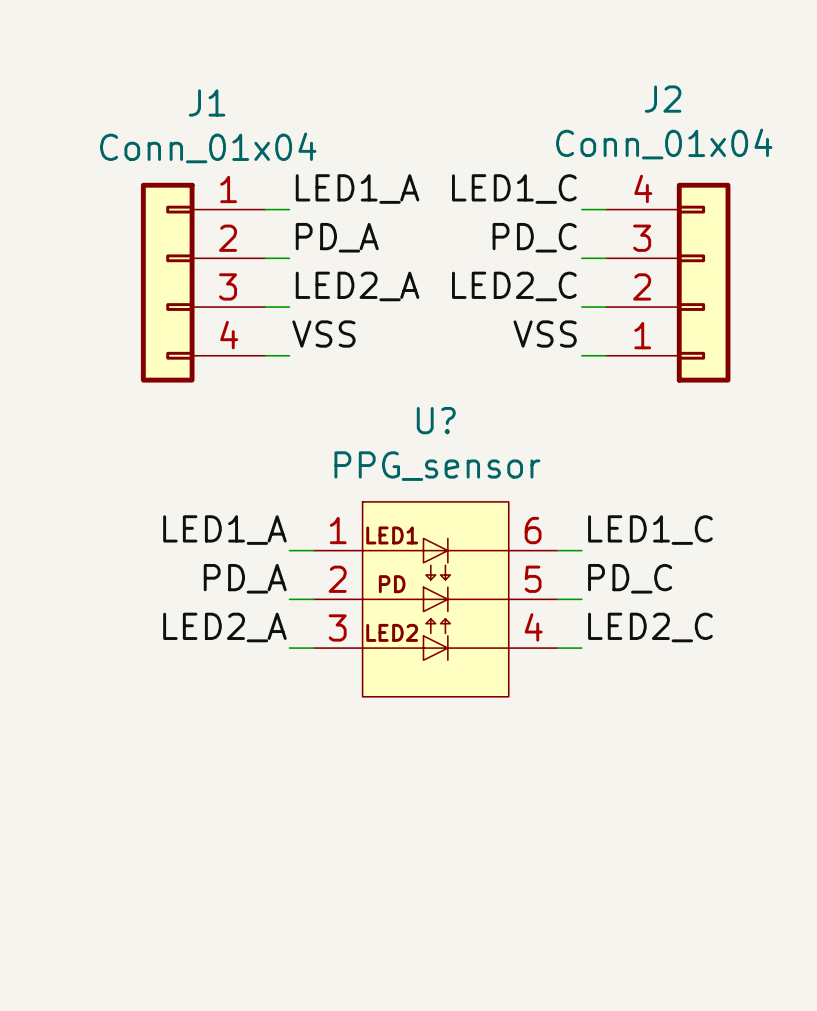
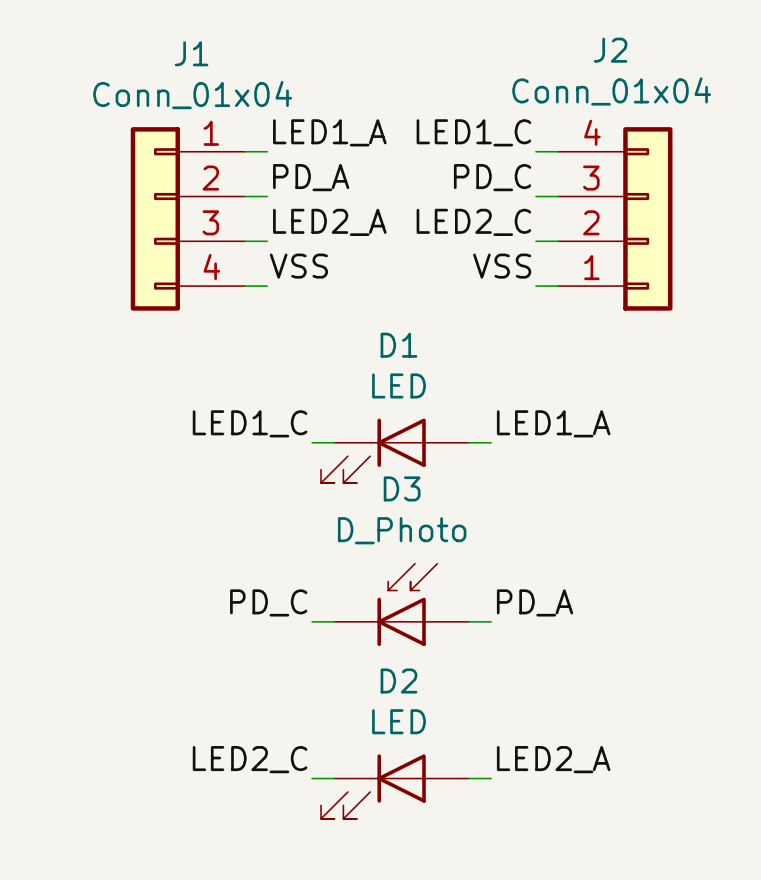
label position: LED1_A (224, 530) -> LED1_A (553, 423)
label position: LED1_C (650, 530) -> LED1_C (250, 423)
D1: none -> LED (394, 450)
wire: (289, 550) (313, 550) -> (312, 442) (334, 442)
wire: (557, 550) (581, 550) -> (468, 442) (491, 442)
label position: PD_A (245, 578) -> PD_A (535, 602)
label position: PD_C (630, 578) -> PD_C (268, 602)
wire: (289, 599) (313, 599) -> (312, 778) (334, 778)
U?: PPG_sensor (435, 599) -> none
wire: (557, 599) (581, 599) -> (468, 778) (491, 778)
label position: LED2_A (224, 627) -> LED2_A (553, 759)
label position: LED2_C (650, 627) -> LED2_C (250, 759)
wire: (289, 648) (313, 648) -> (312, 621) (334, 621)
wire: (557, 648) (581, 648) -> (468, 621) (491, 621)
D3: none -> D_Photo (401, 604)
D2: none -> LED (394, 786)

